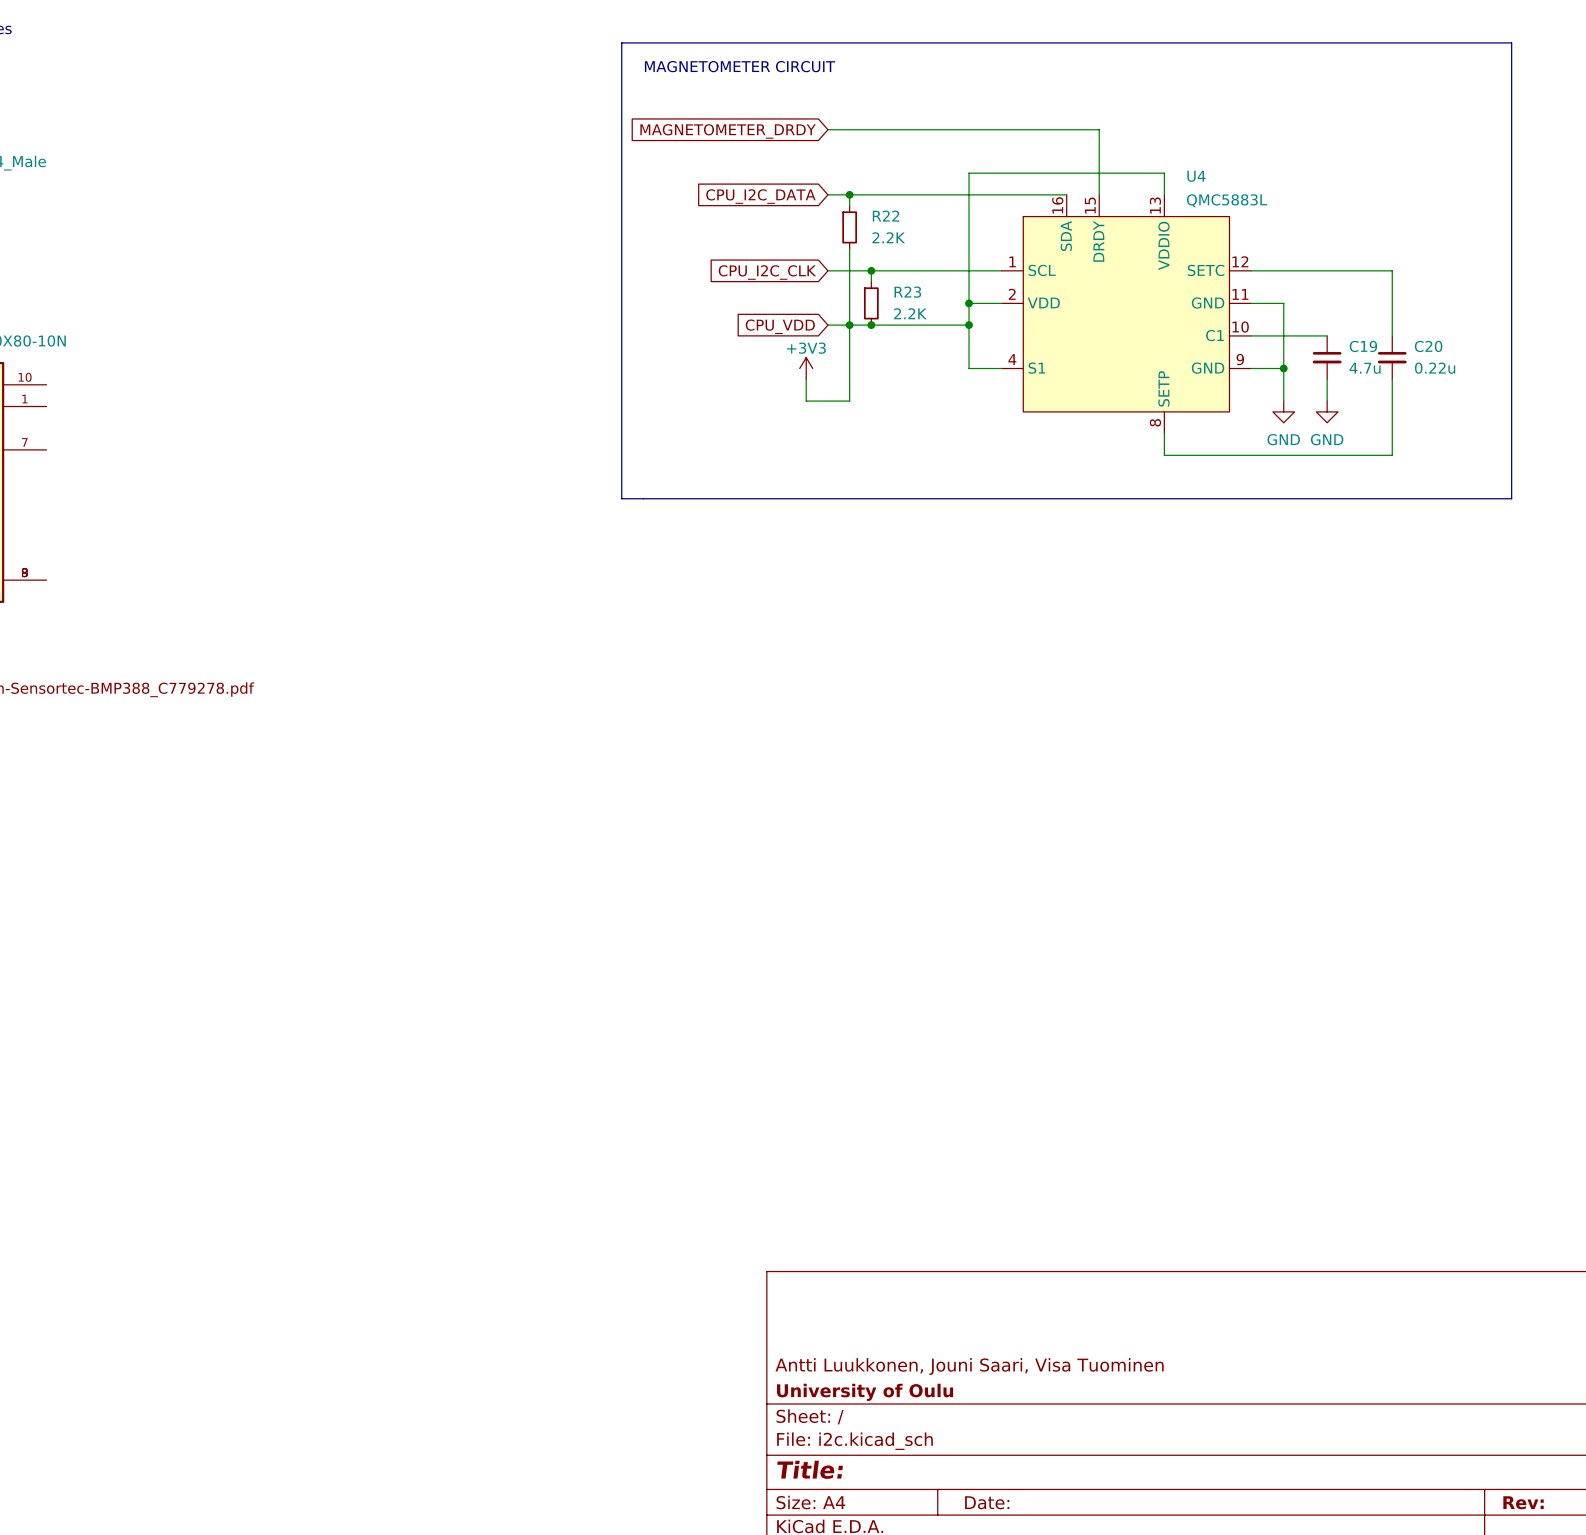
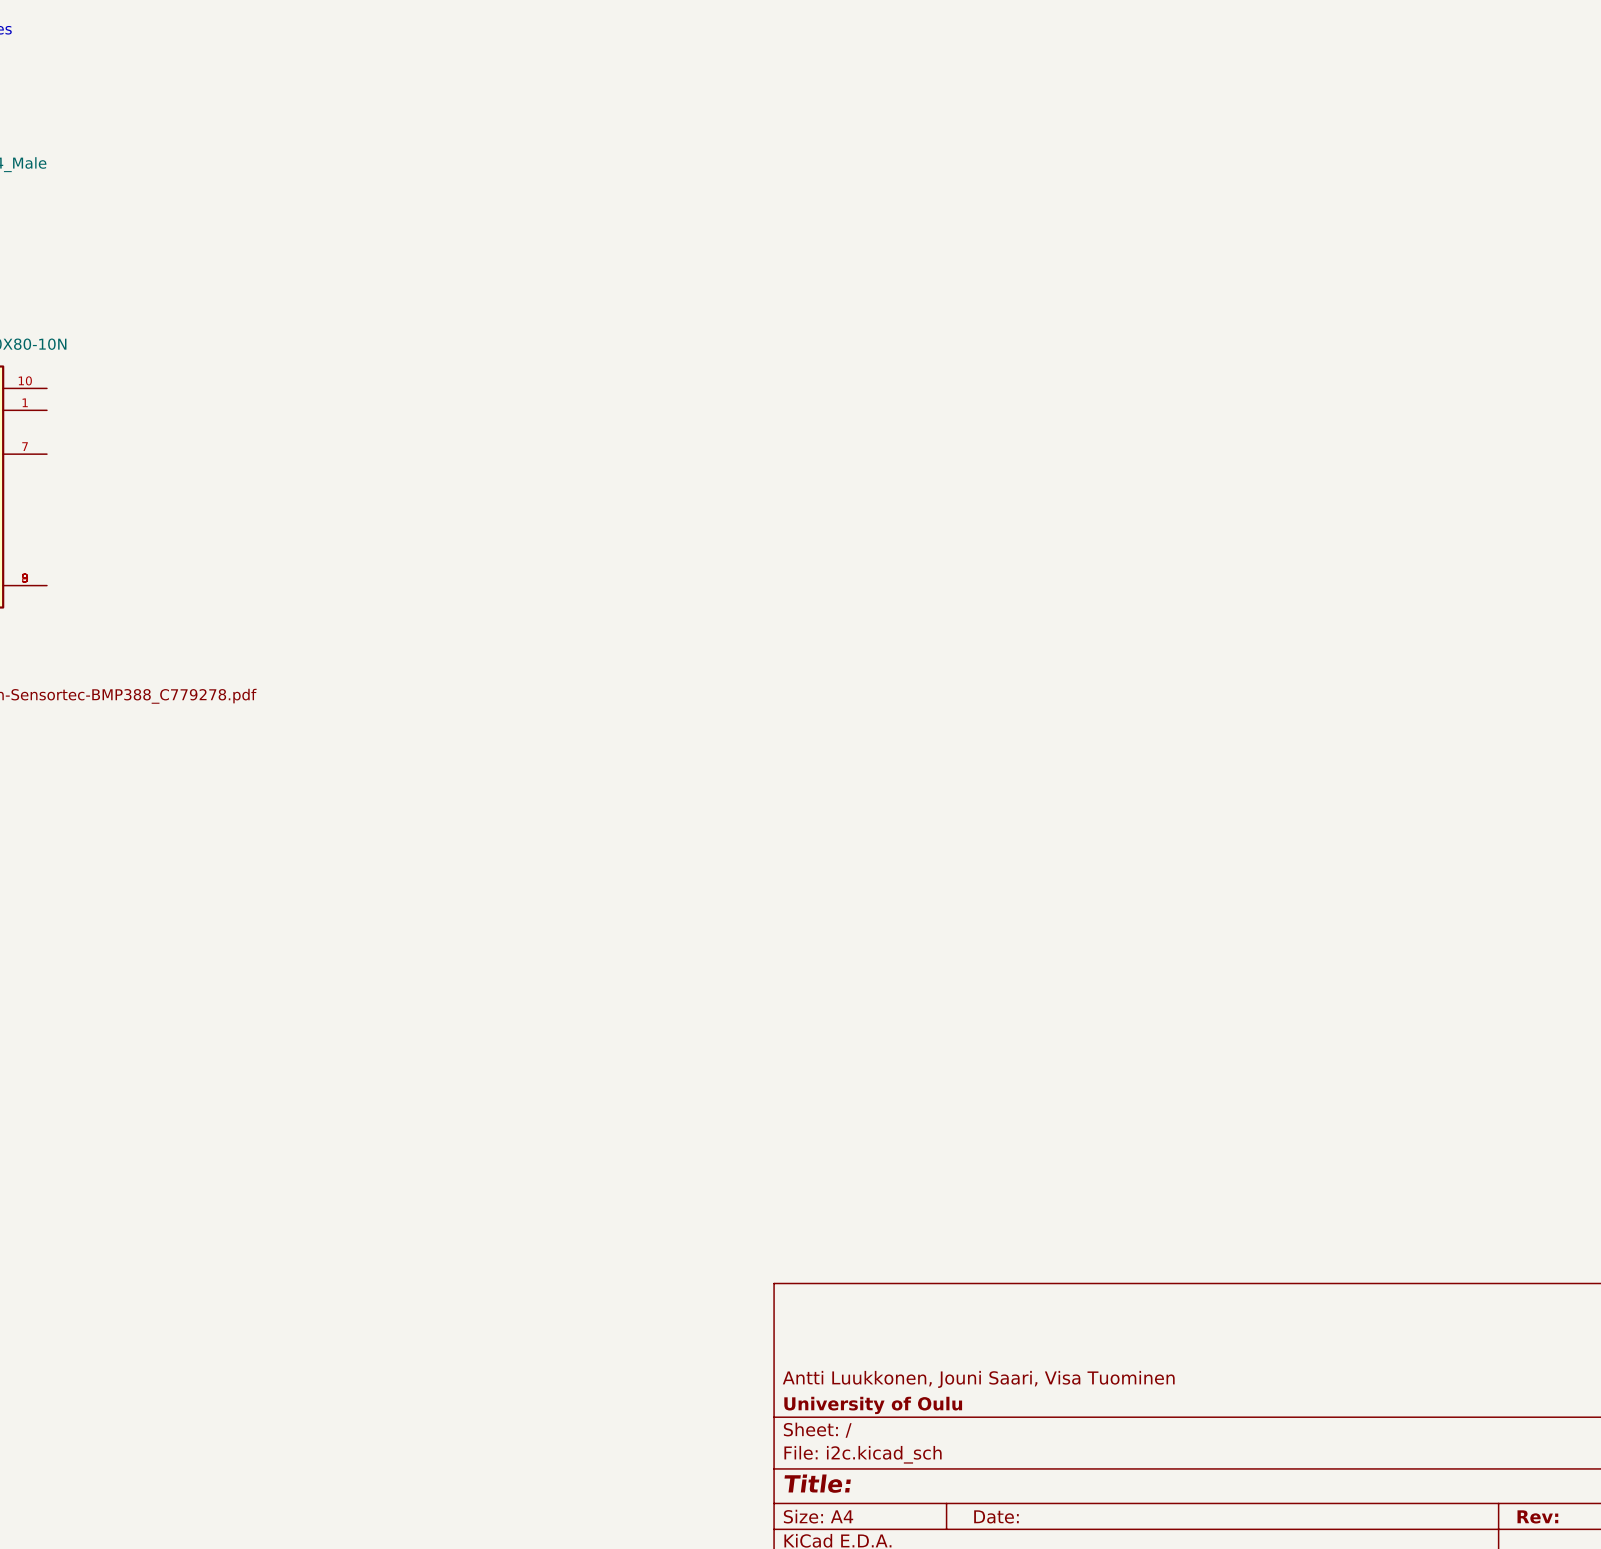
line: (621, 42) (1511, 42) (1511, 498) (621, 498) (621, 42) -> none
text: MAGNETOMETER CIRCUIT (740, 66) -> none
wire: (827, 129) (1099, 129) (1099, 194) -> none
global label: MAGNETOMETER_DRDY (728, 131) -> none
wire: (827, 194) (1066, 194) -> none
wire: (849, 194) (849, 205) -> none
junction: (849, 194) -> none
wire: (1164, 194) (1164, 173) (969, 173) (969, 368) (1001, 368) -> none
global label: CPU_I2C_DATA (760, 196) -> none
R22: 2.2K (849, 227) -> none
wire: (849, 249) (849, 401) (806, 401) (806, 379) -> none
wire: (827, 270) (1001, 270) -> none
wire: (871, 270) (871, 281) -> none
junction: (871, 270) -> none
wire: (1251, 270) (1392, 270) (1392, 335) -> none
global label: CPU_I2C_CLK (767, 272) -> none
R23: 2.2K (871, 303) -> none
wire: (969, 303) (1001, 303) -> none
junction: (969, 303) -> none
wire: (1251, 303) (1283, 303) (1283, 401) -> none
U4: QMC5883L (1126, 314) -> none
wire: (827, 325) (969, 325) -> none
junction: (849, 325) -> none
junction: (871, 325) -> none
junction: (969, 325) -> none
global label: CPU_VDD (780, 326) -> none
wire: (1251, 335) (1327, 335) -> none
C19: 4.7u (1327, 357) -> none
C20: 0.22u (1392, 357) -> none
power symbol: +3V3 (806, 368) -> none
wire: (1251, 368) (1283, 368) -> none
junction: (1283, 368) -> none
wire: (1327, 379) (1327, 401) -> none
wire: (1392, 379) (1392, 455) (1164, 455) (1164, 433) -> none
power symbol: GND (1283, 411) -> none
power symbol: GND (1327, 411) -> none

